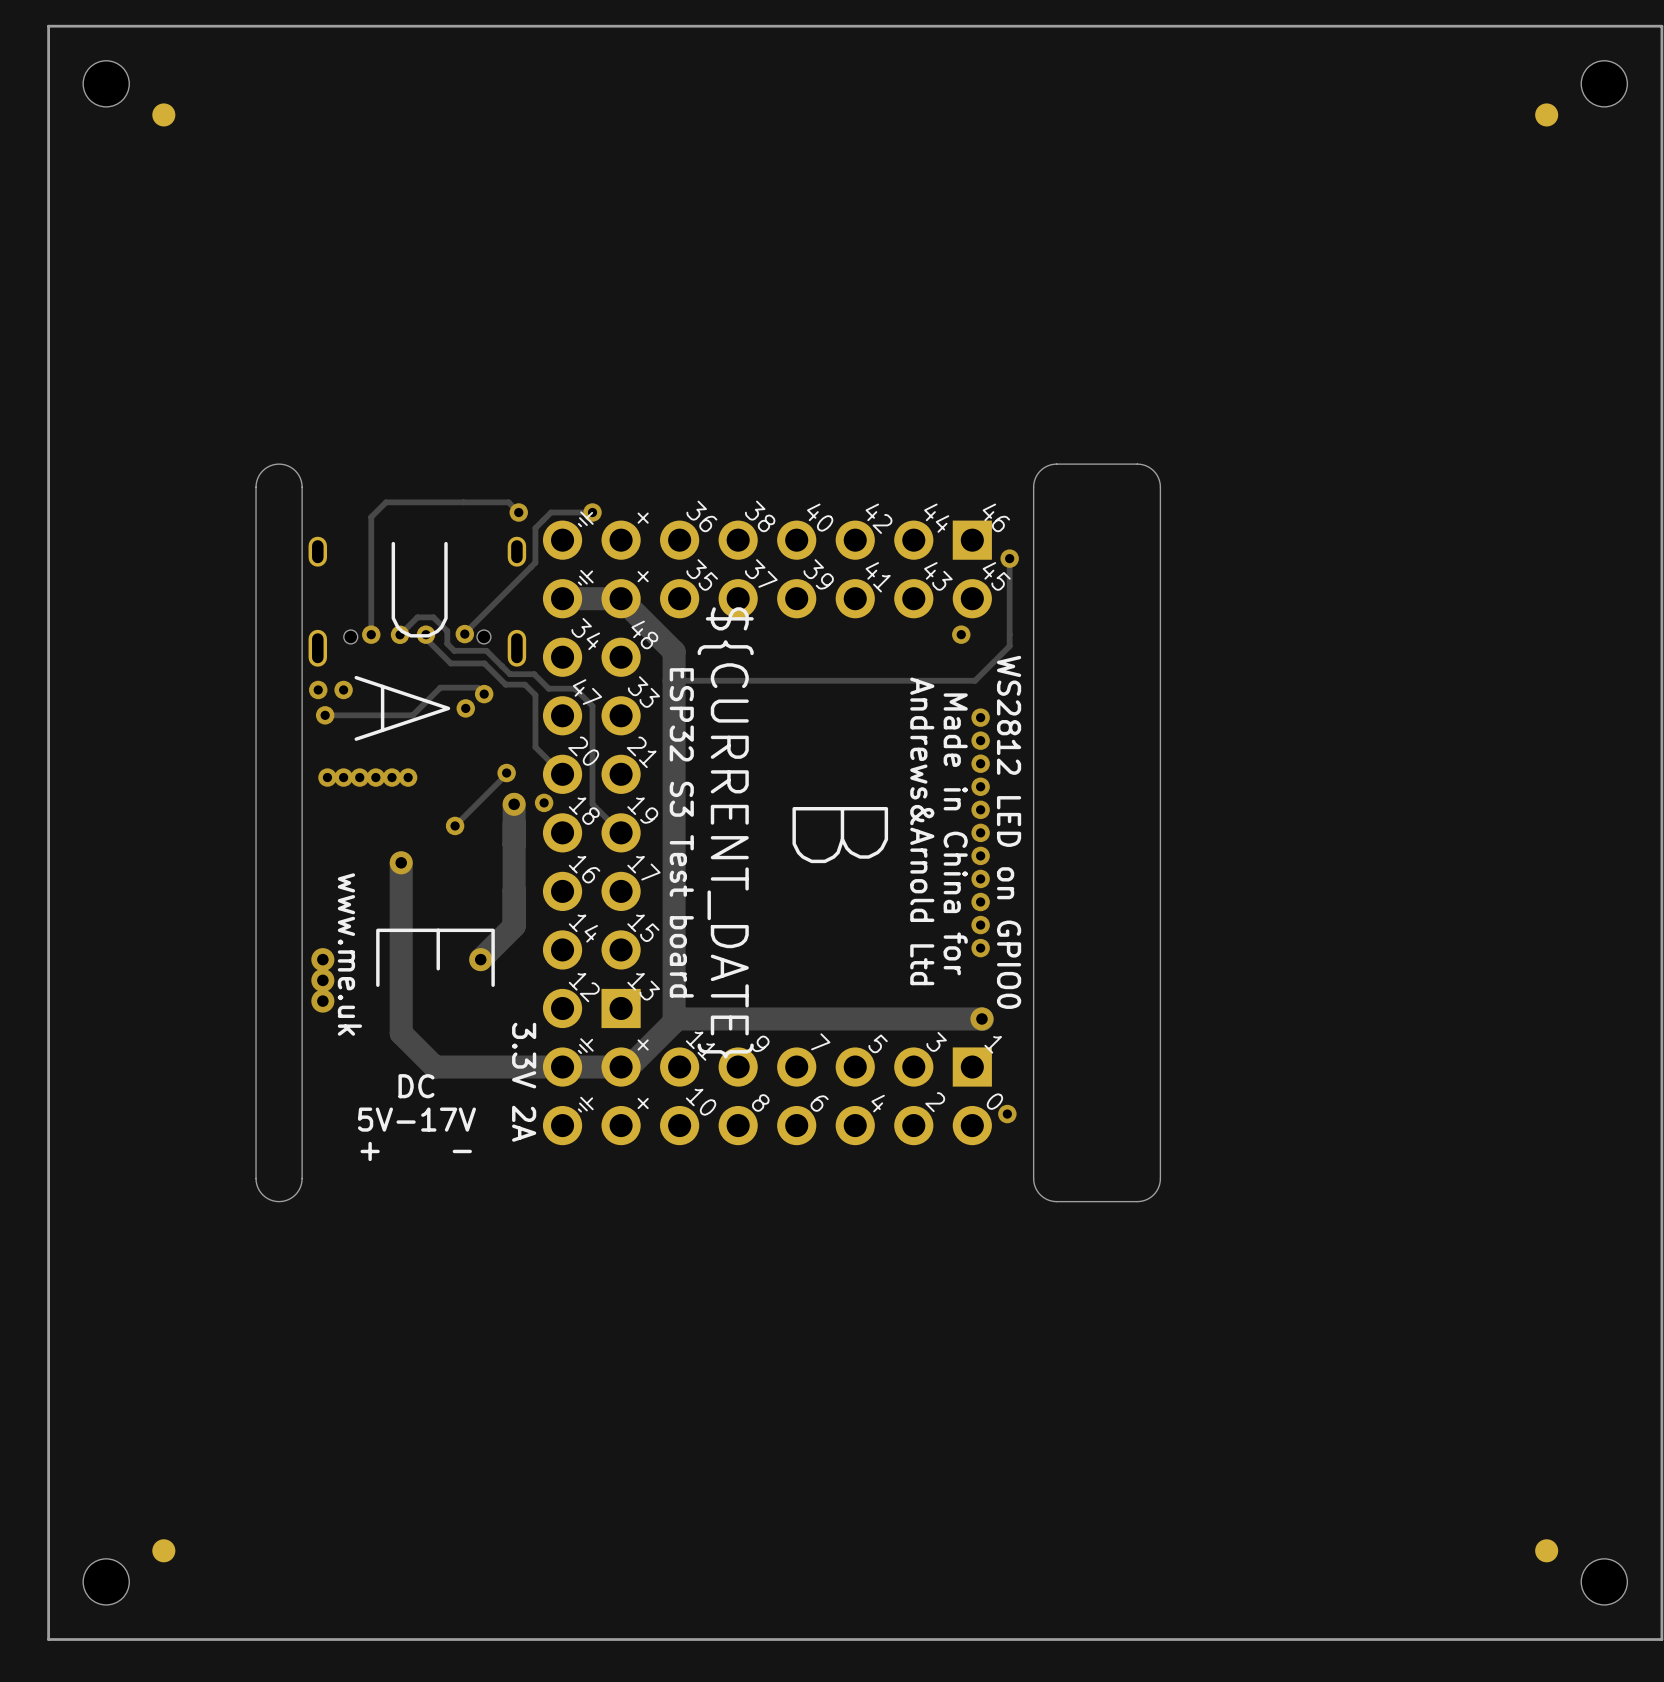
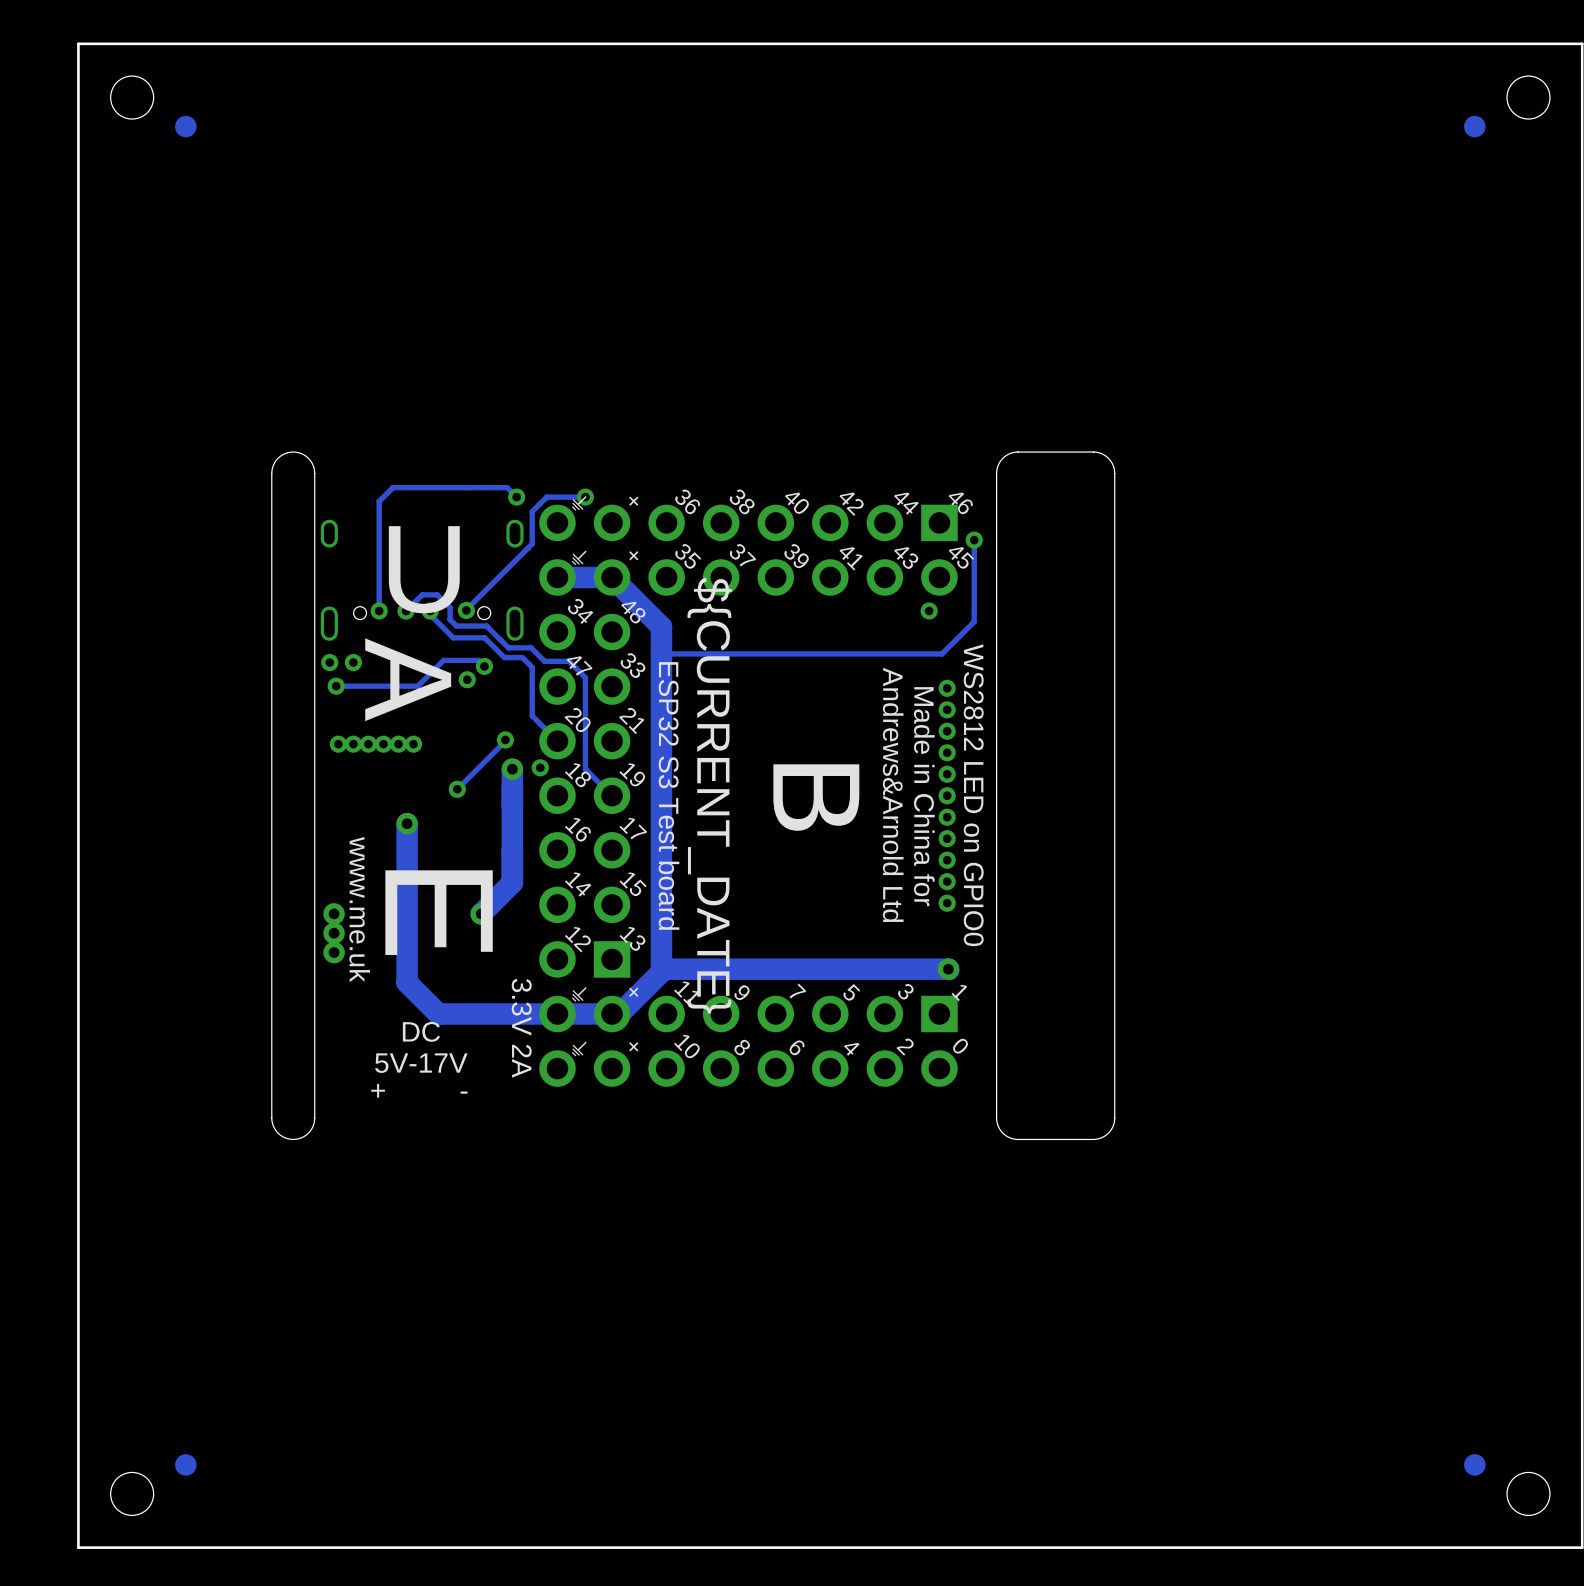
via: (1007, 1114) -> none

